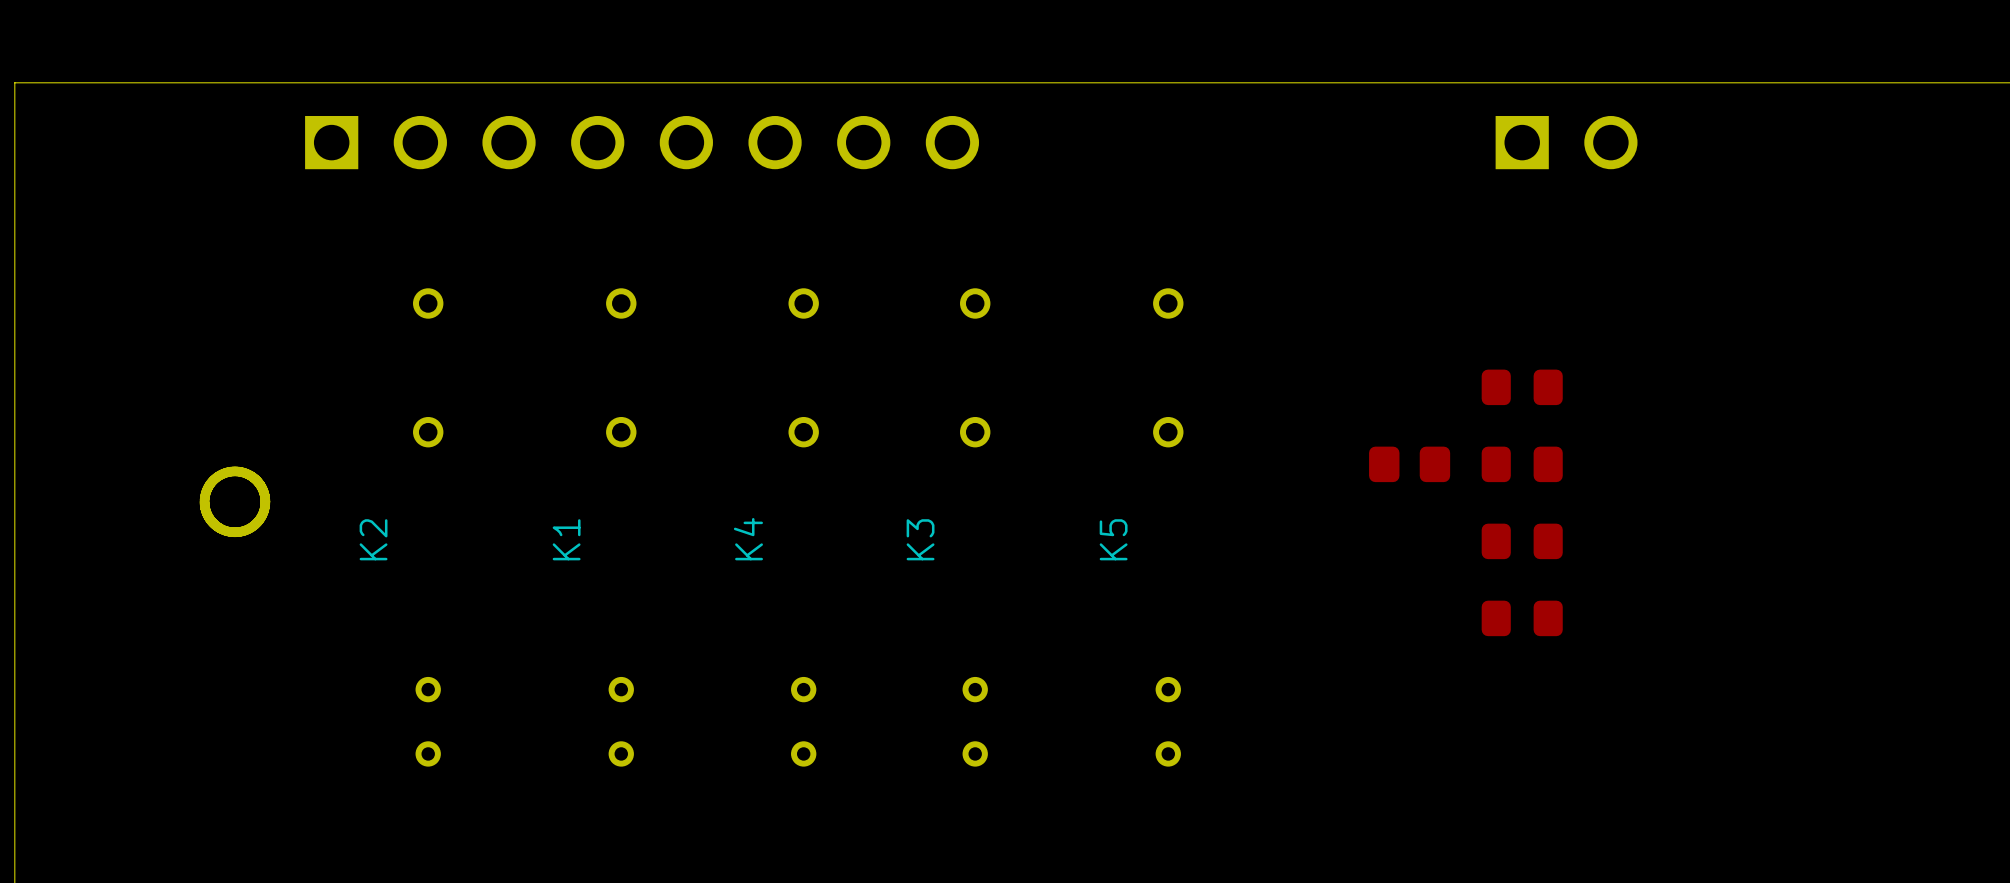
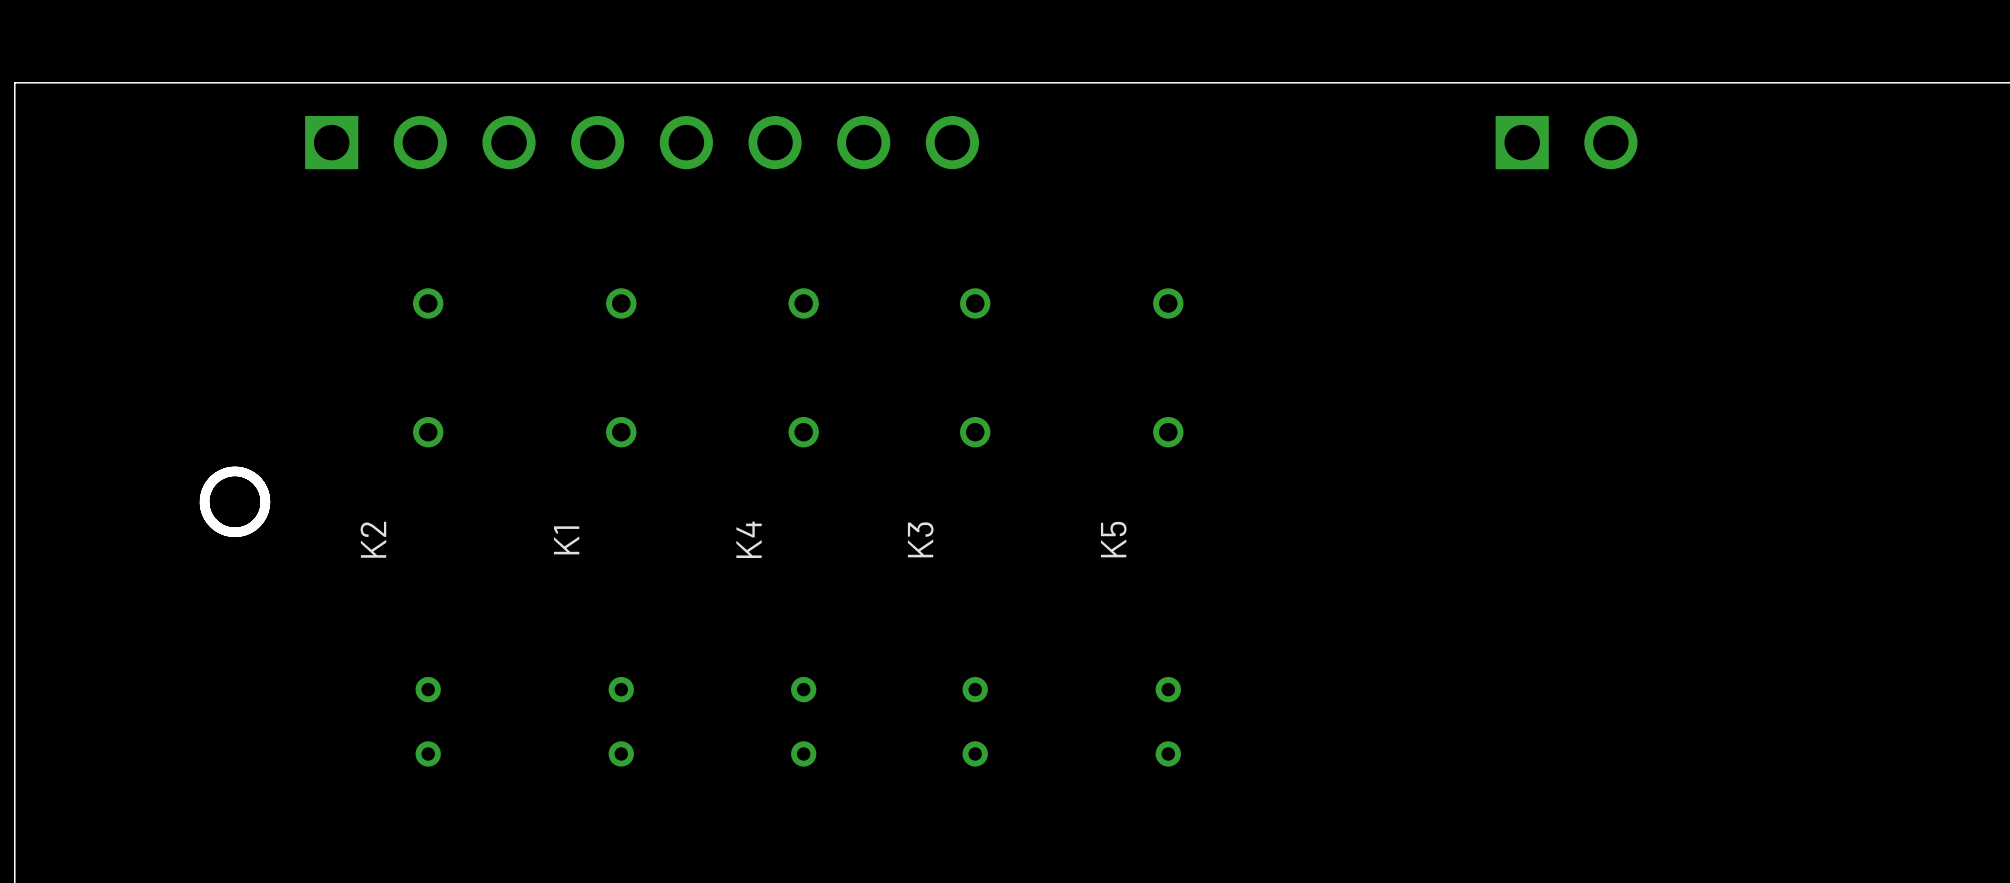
part: (1522, 387) -> none
part: (1409, 464) -> none
part: (1522, 464) -> none
part: (1522, 541) -> none
part: (1522, 618) -> none

